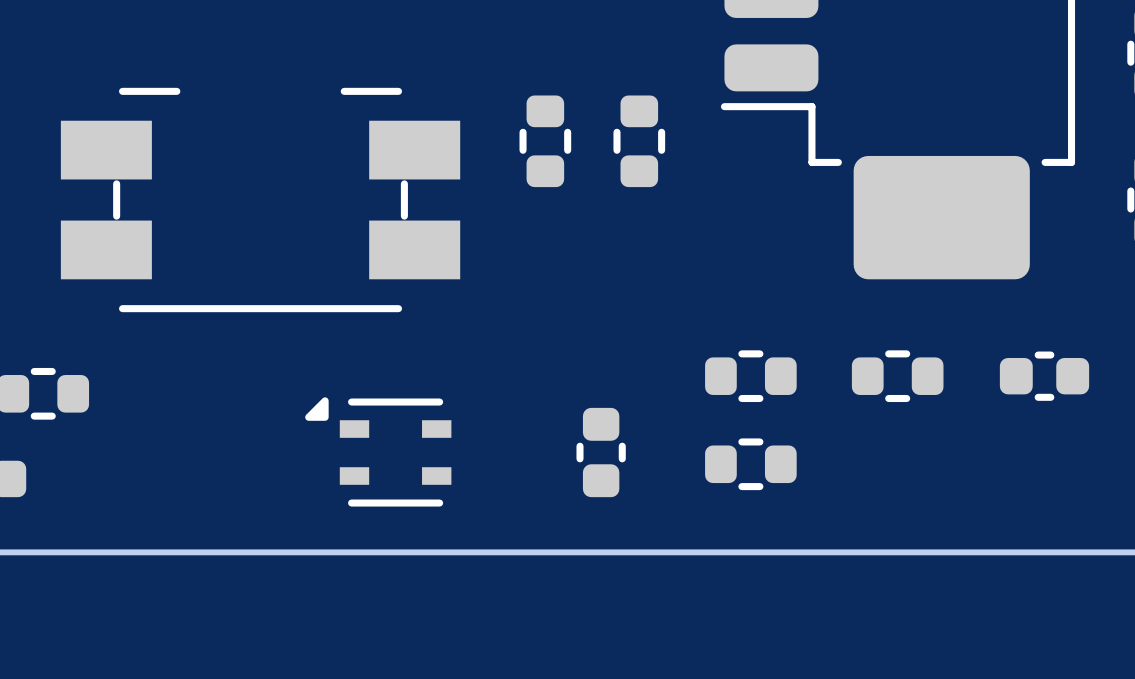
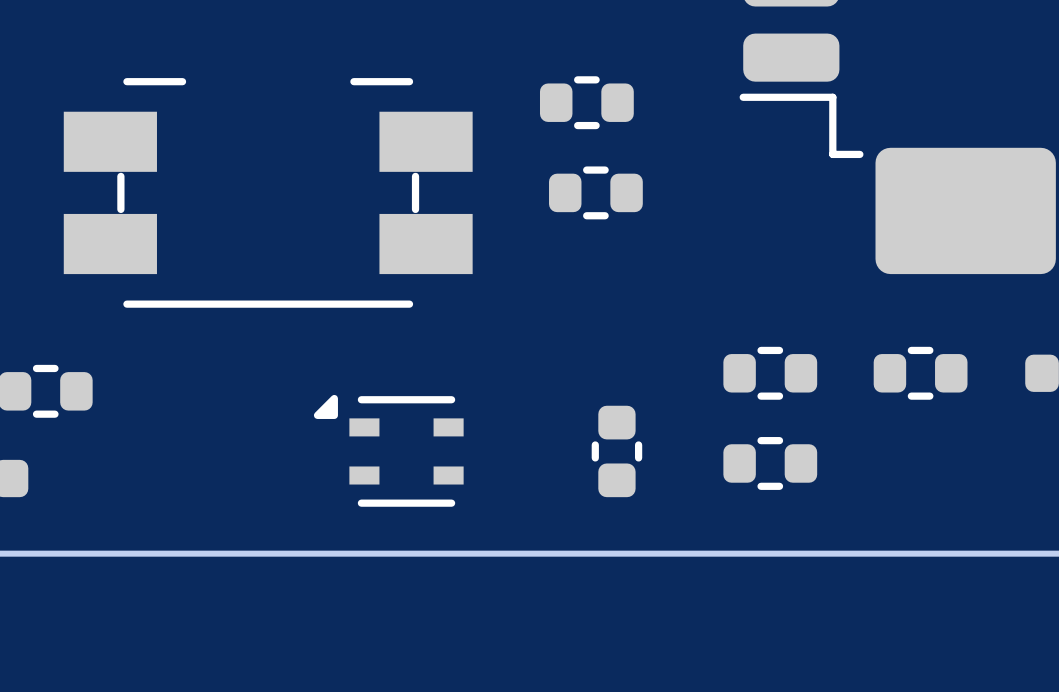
part: none -> (586, 102)
part: (545, 141) -> none
part: (639, 141) -> none
part: none -> (595, 192)

